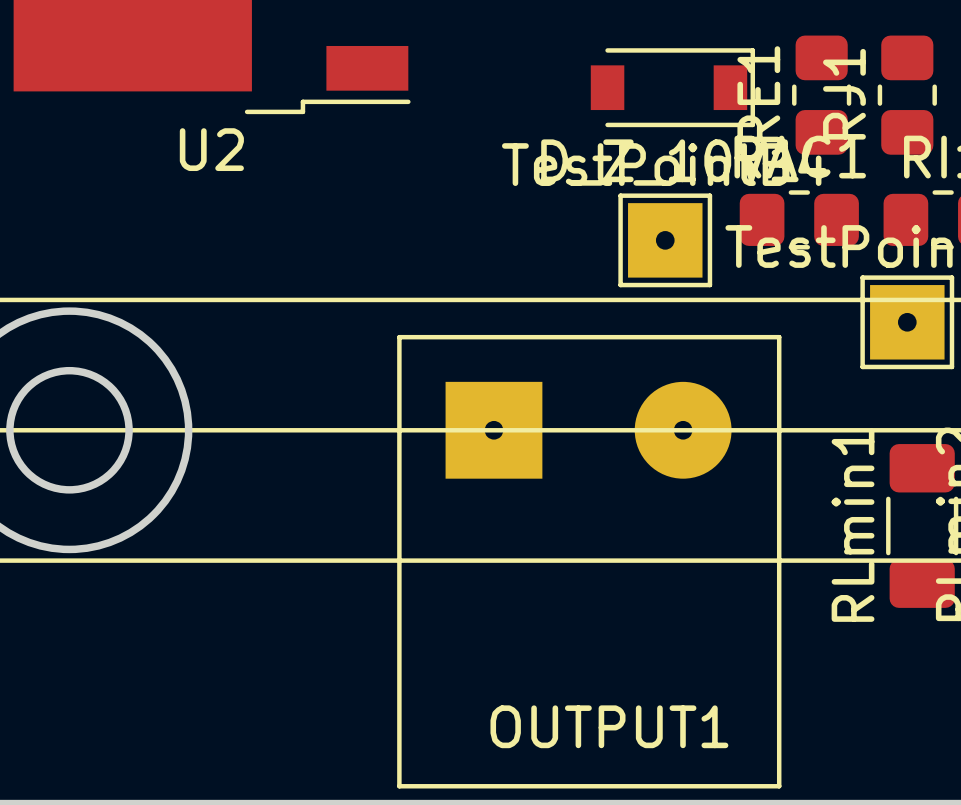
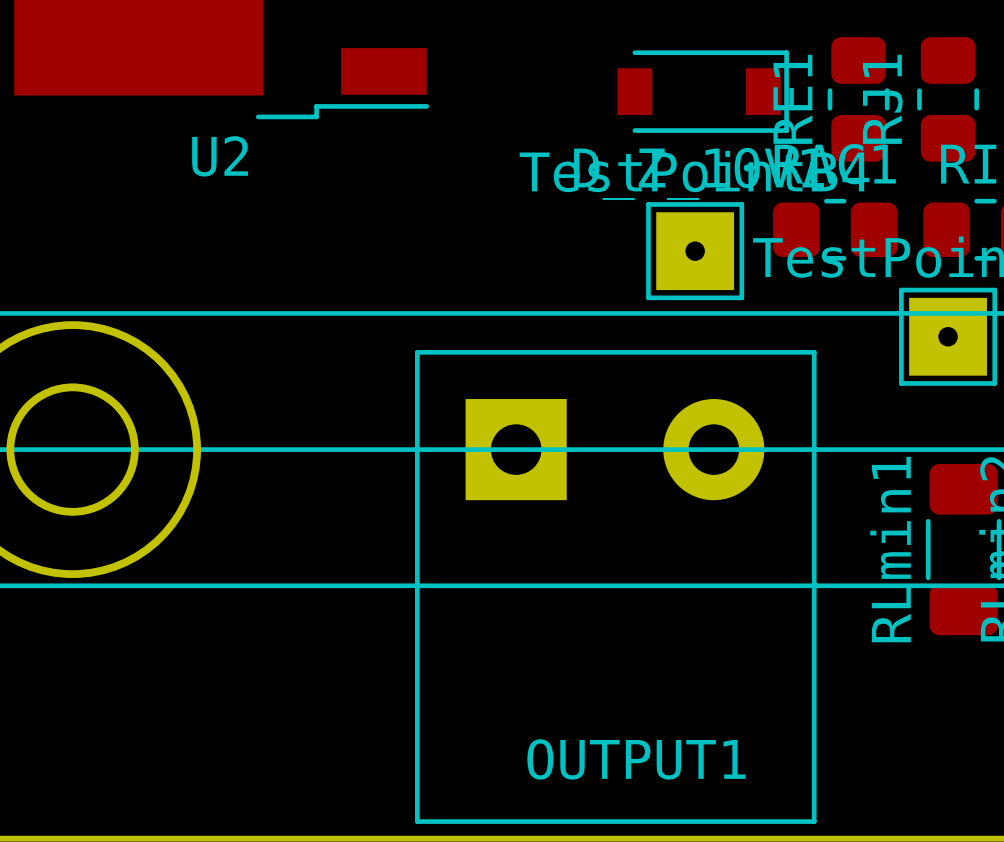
OUTPUT1 footprint: [397, 334, 782, 789] -> [415, 349, 817, 824]

